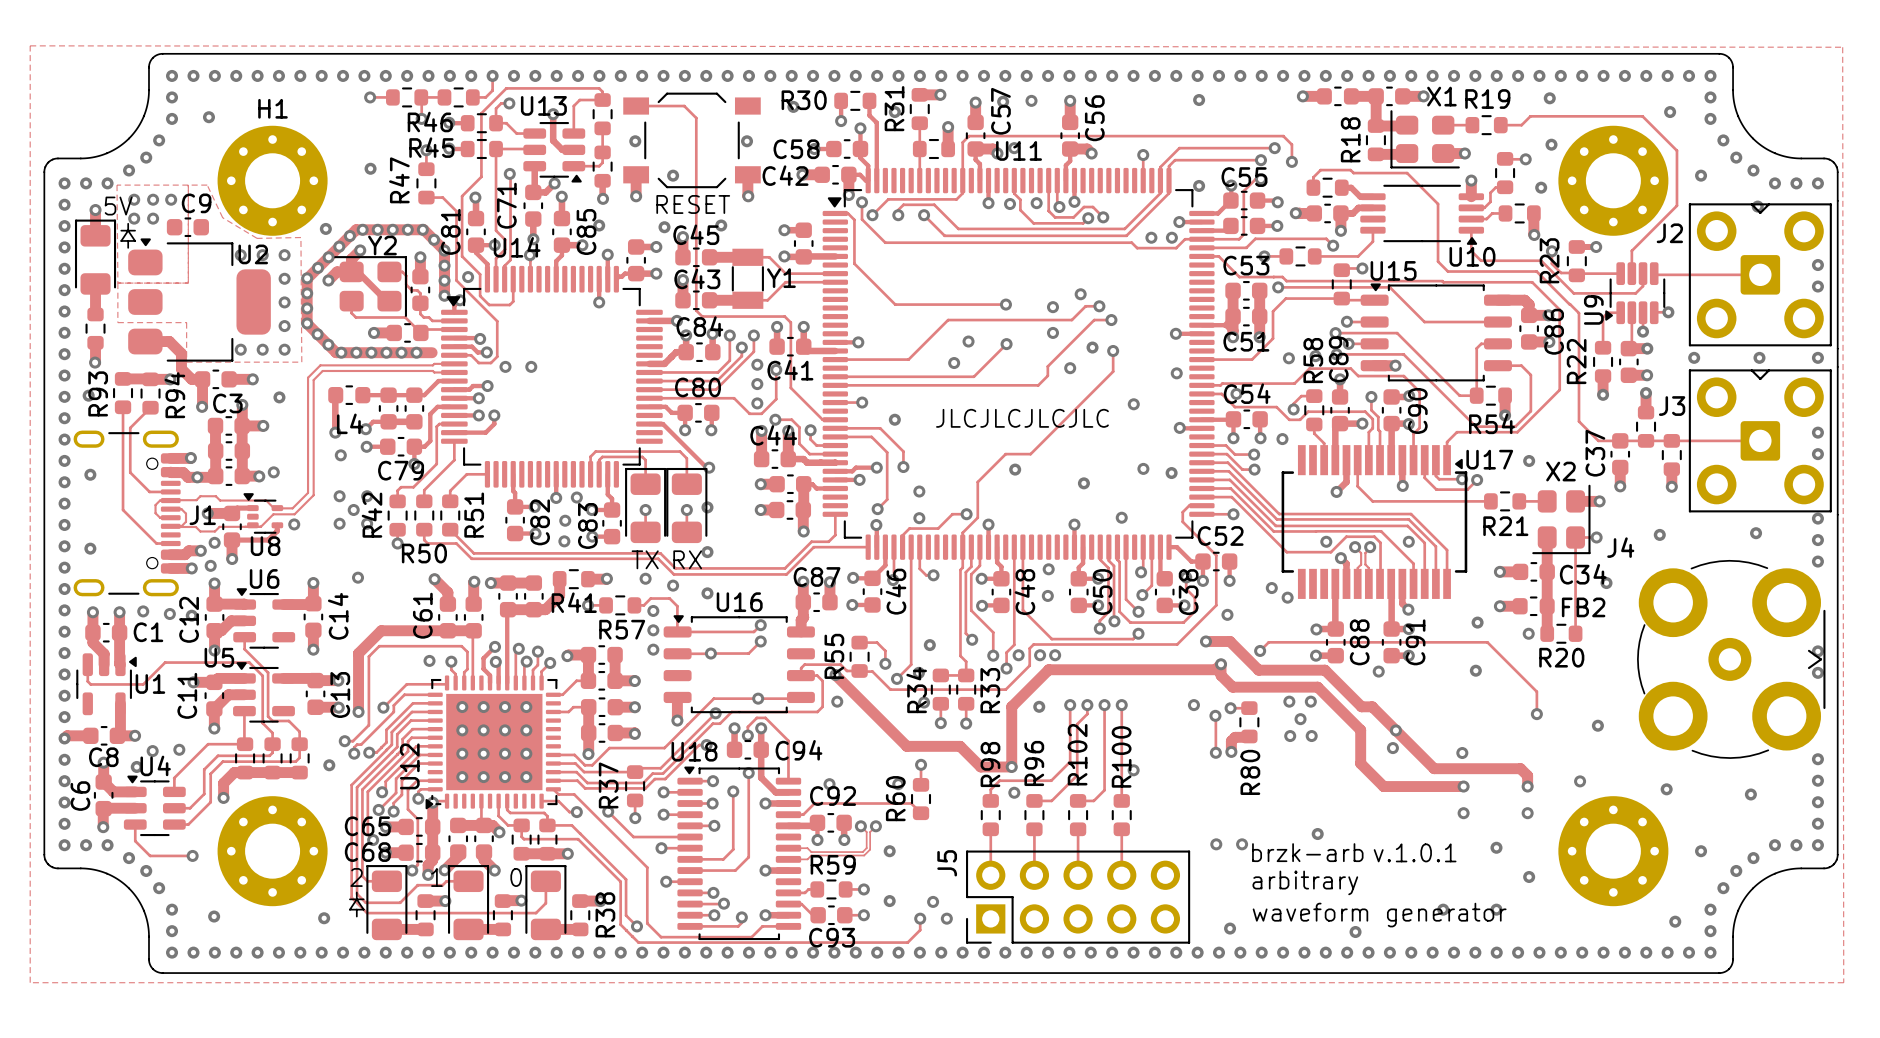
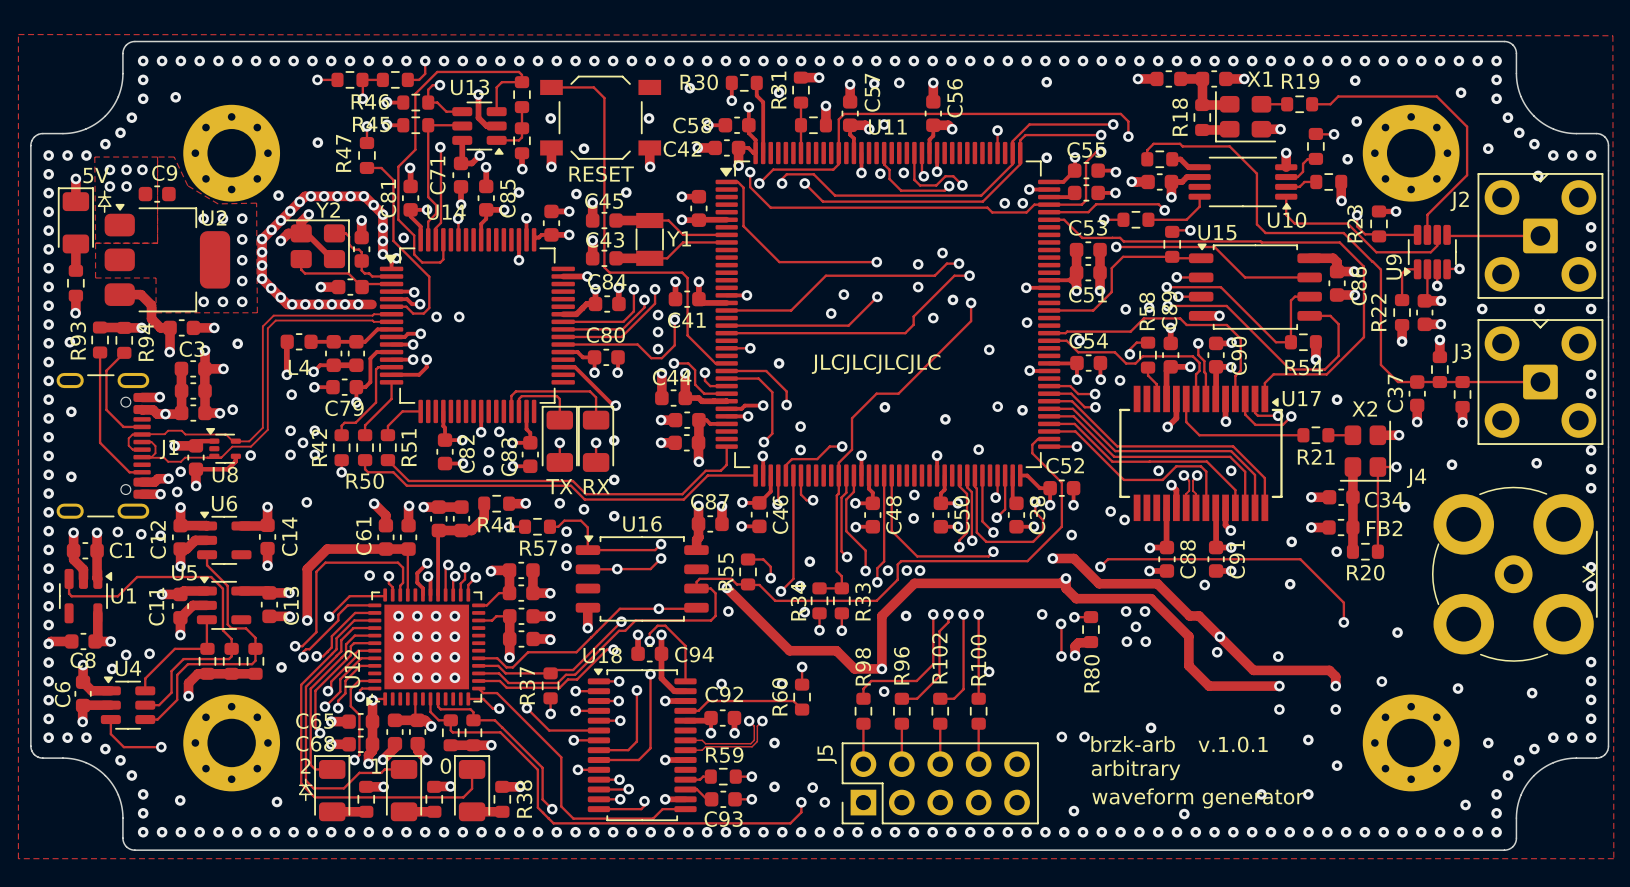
H1 name: H1 (272, 108) -> none

